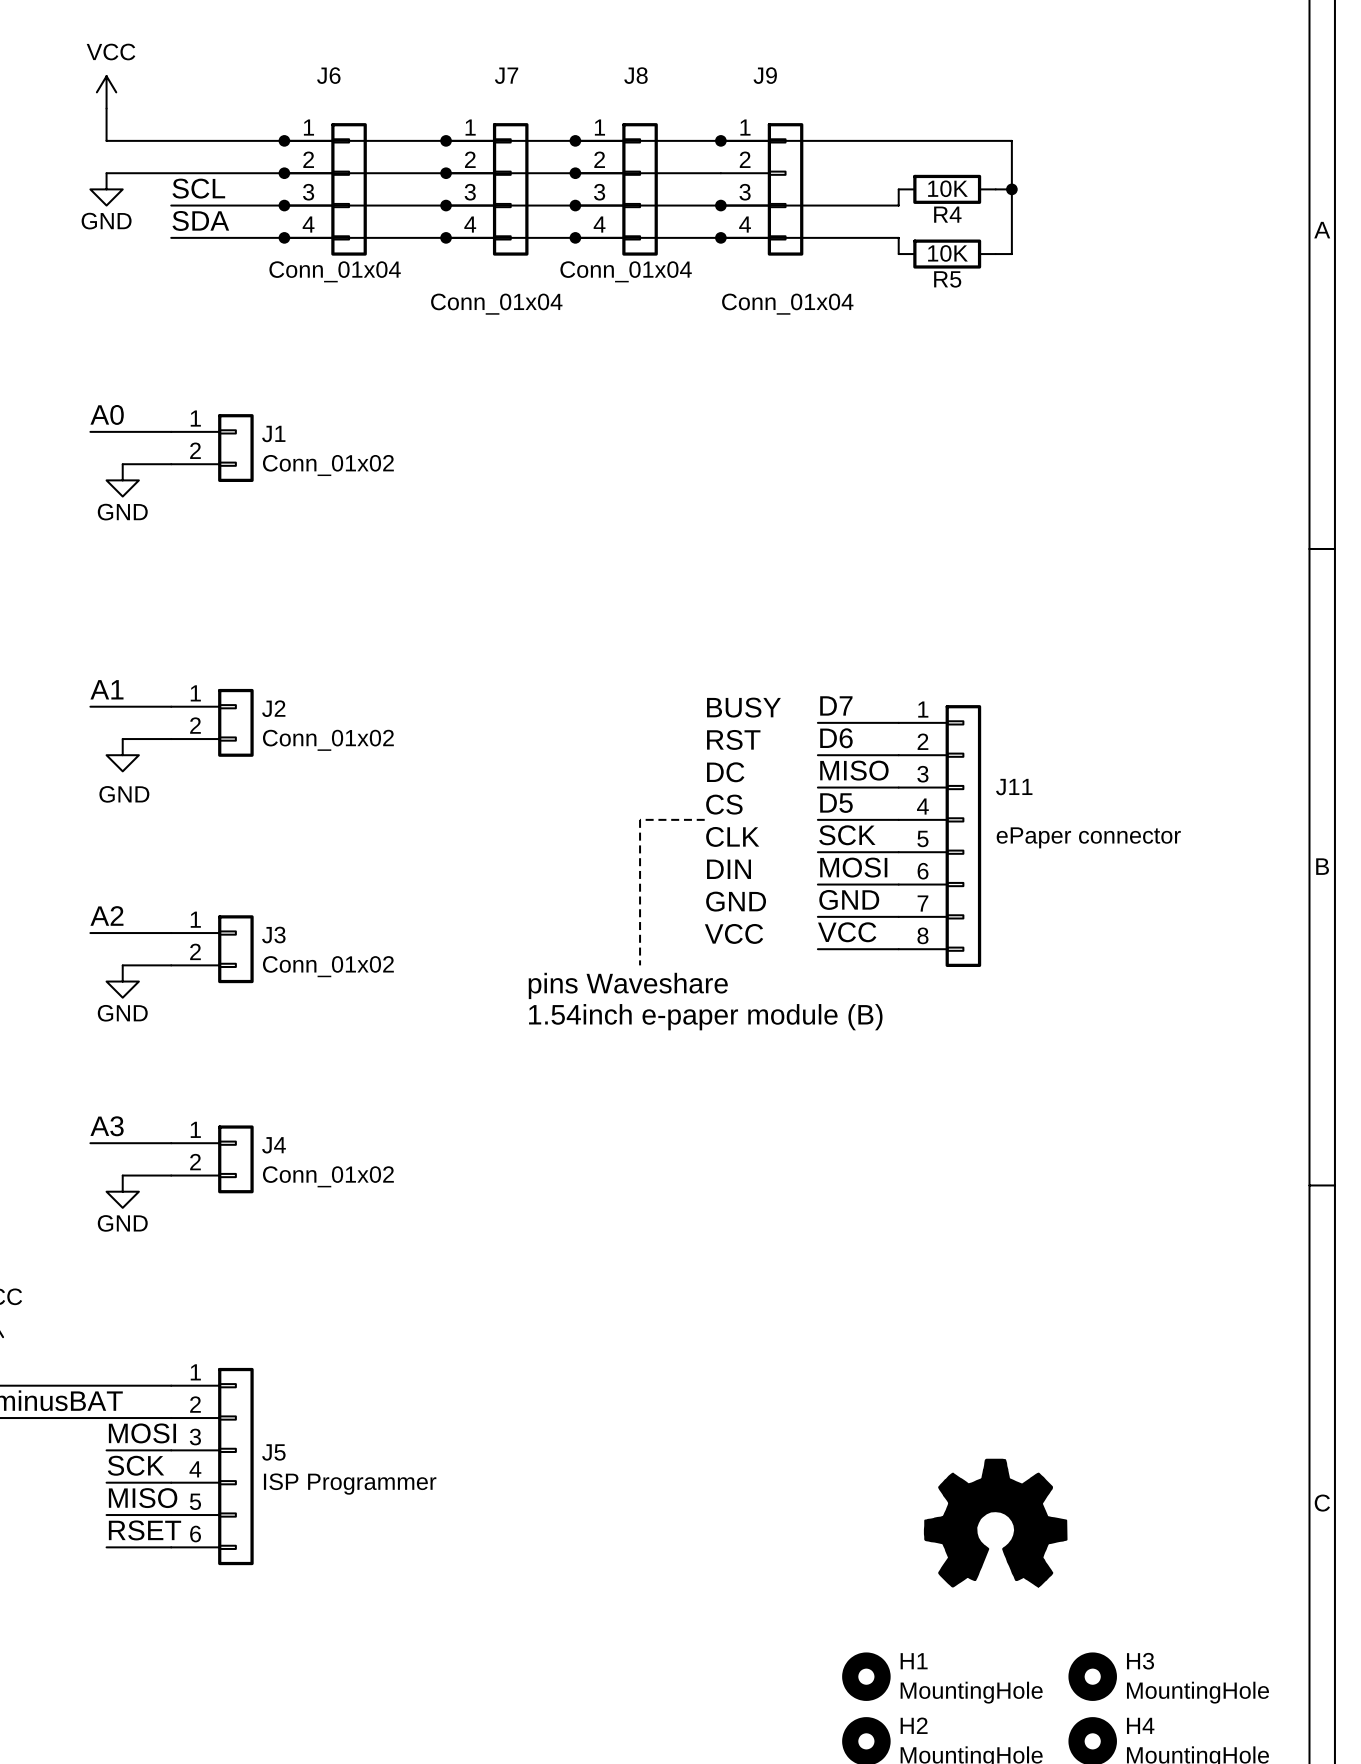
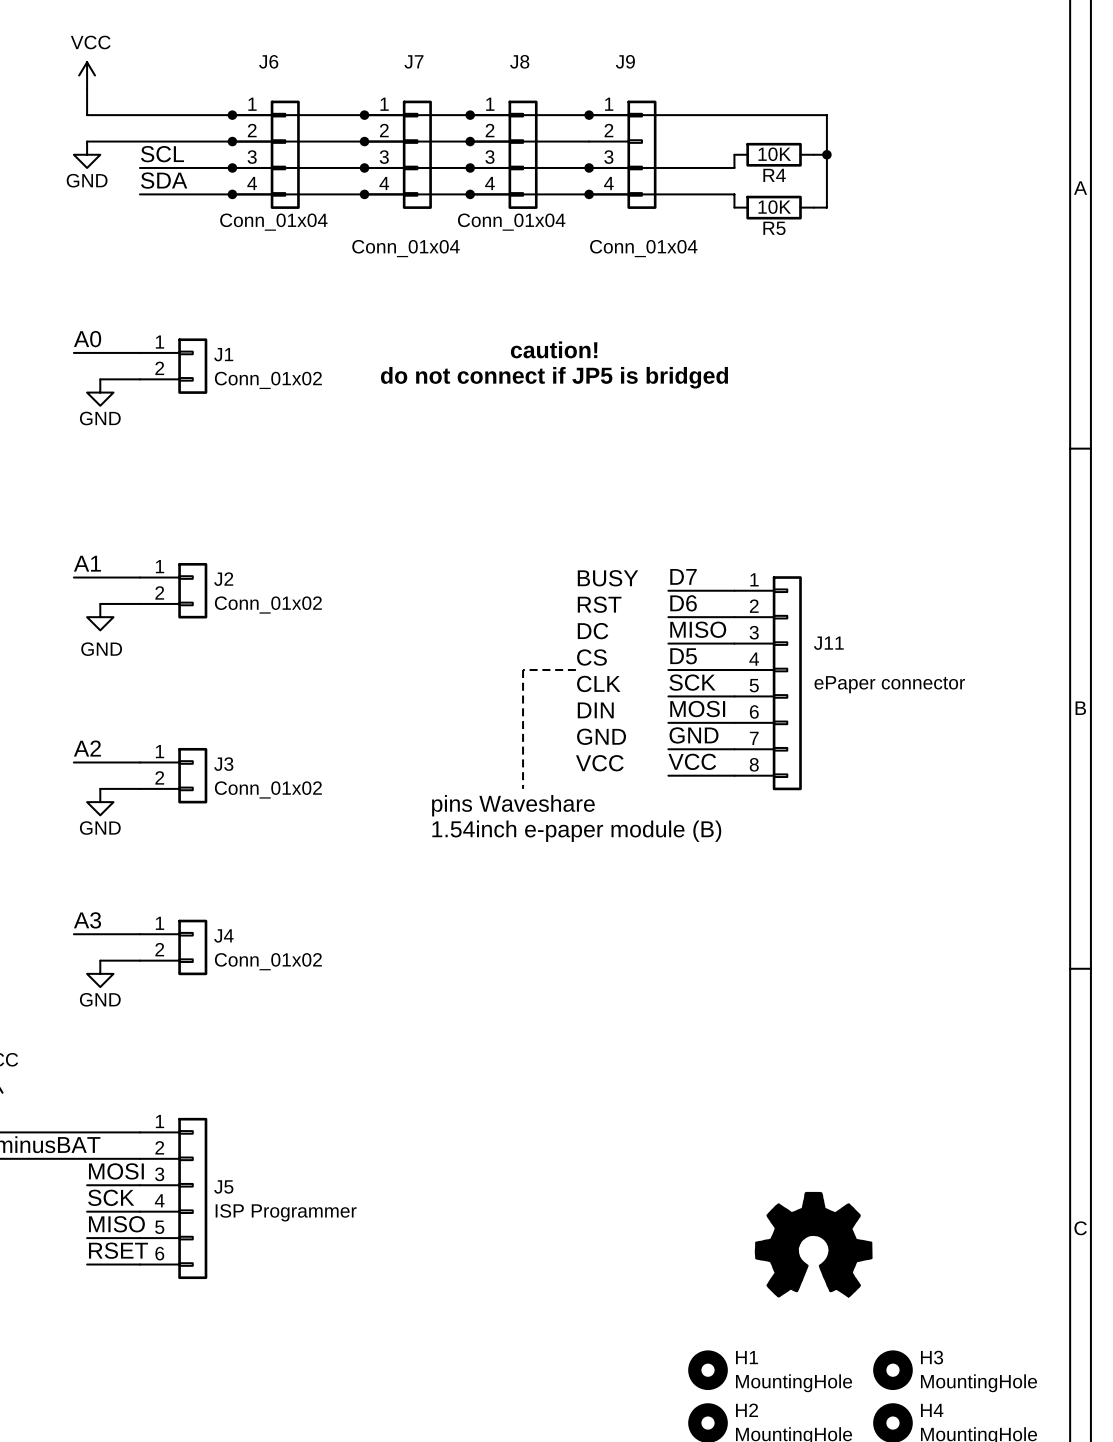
text: none -> caution! (554, 349)
text: none -> do not connect if JP5 is bridged (554, 377)

